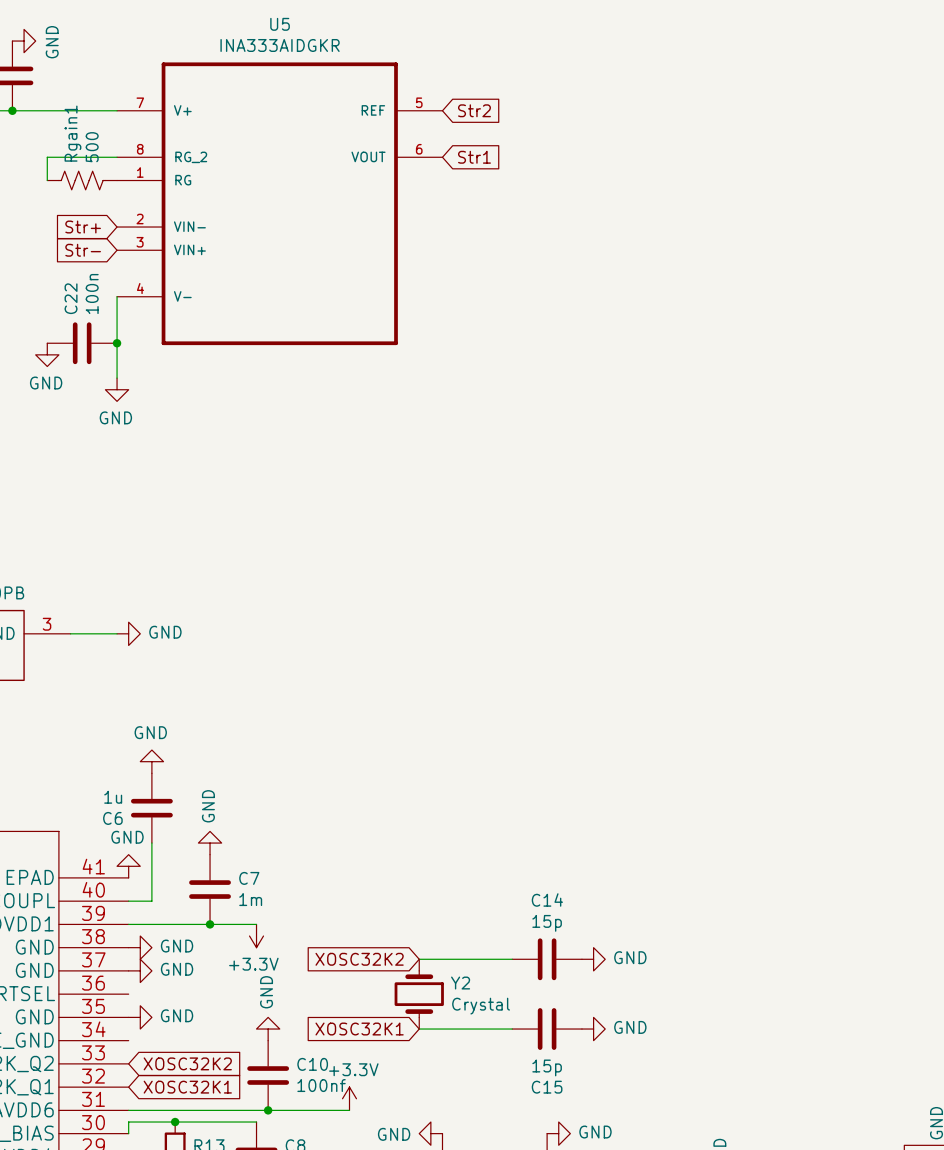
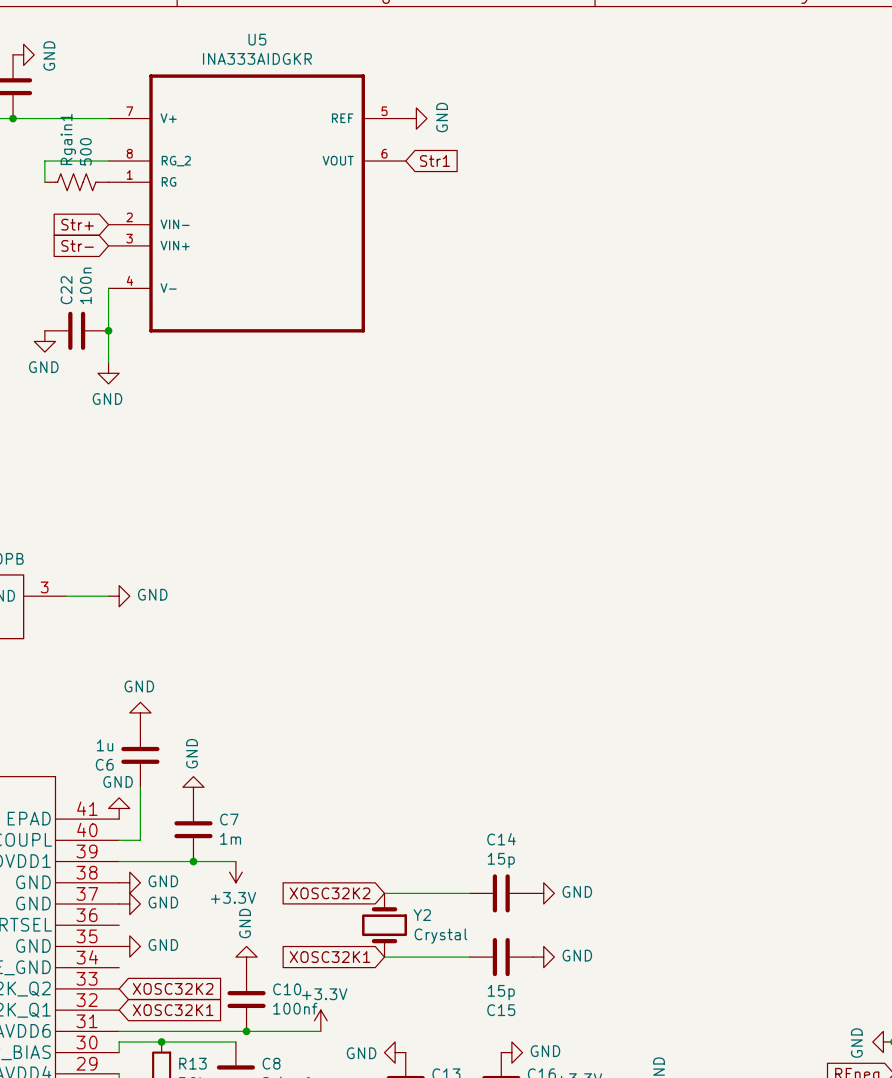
power symbol: none -> GND (416, 118)
global label: Str2 (474, 110) -> none

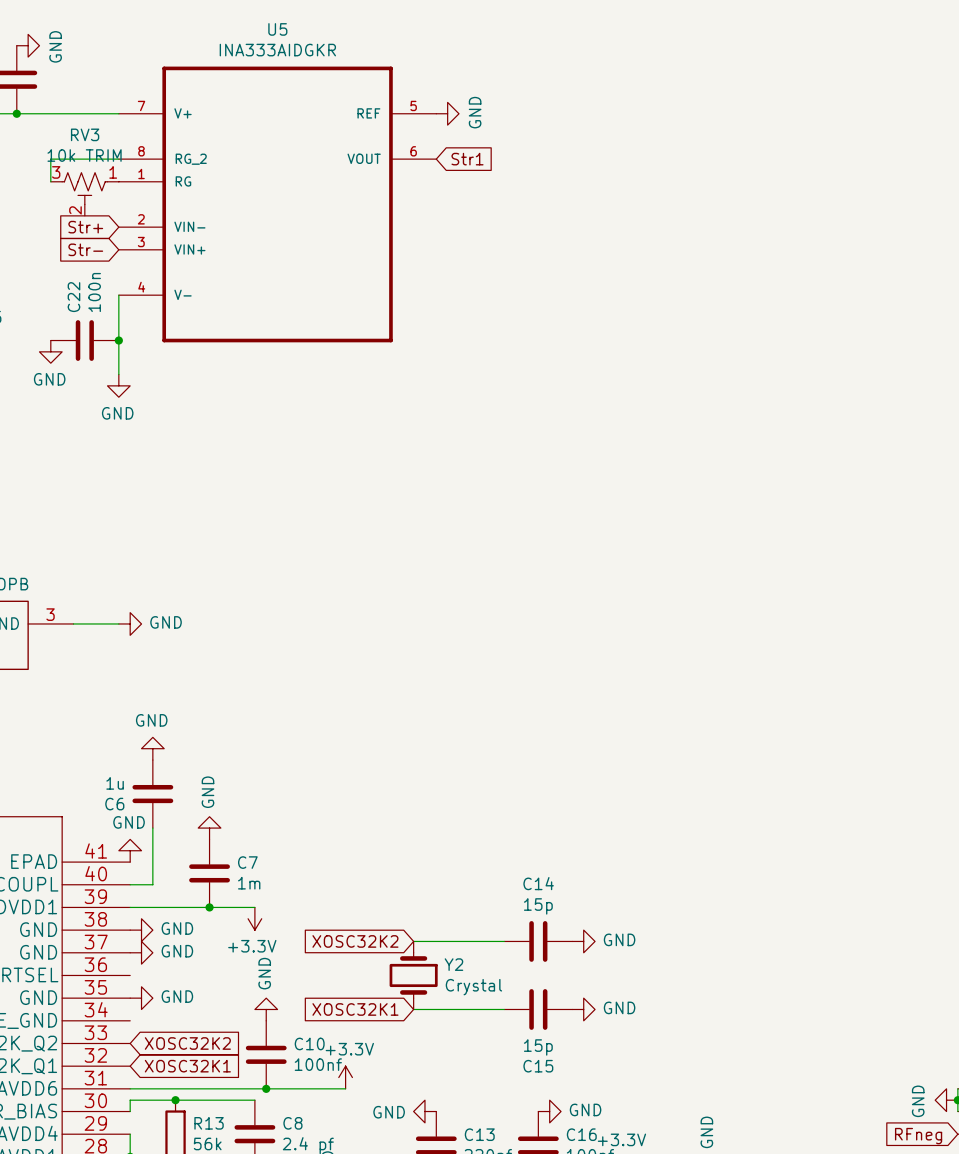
Rgain1: 500 (76, 182) -> none
RV3: none -> 10k TRIM (84, 194)

